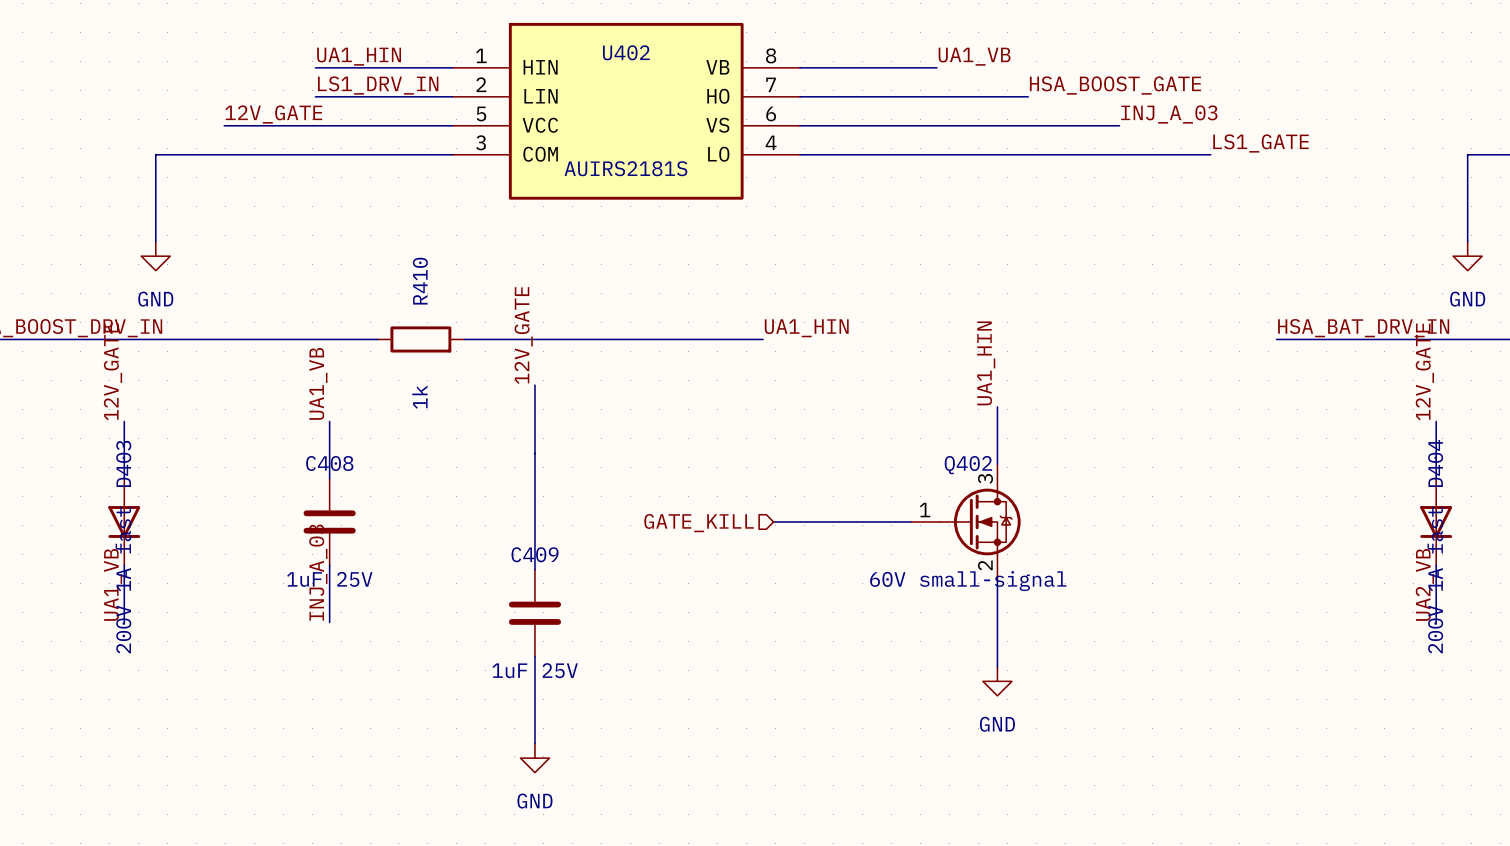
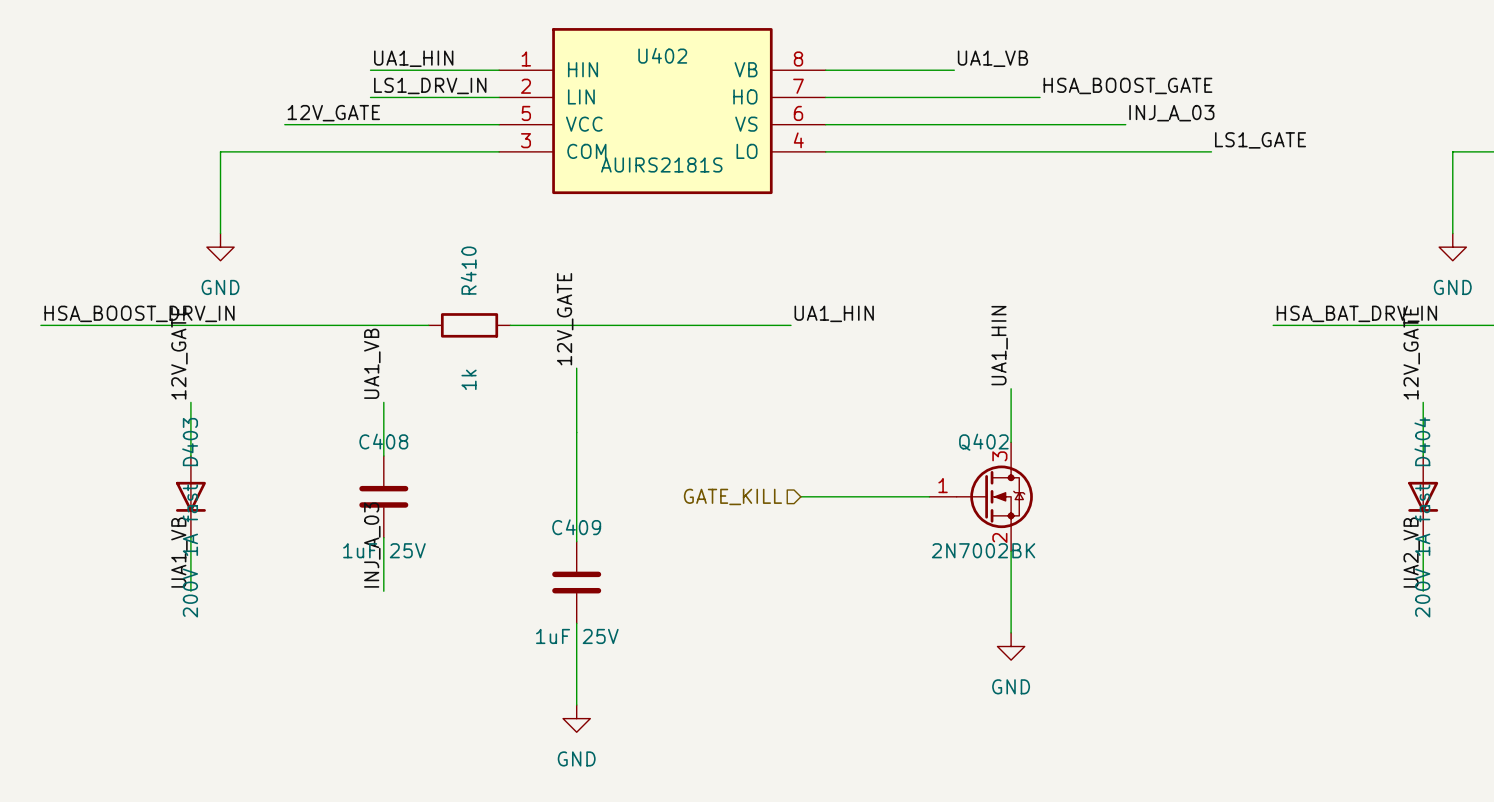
Q402 value: 60V small-signal (968, 581) -> 2N7002BK (983, 550)

